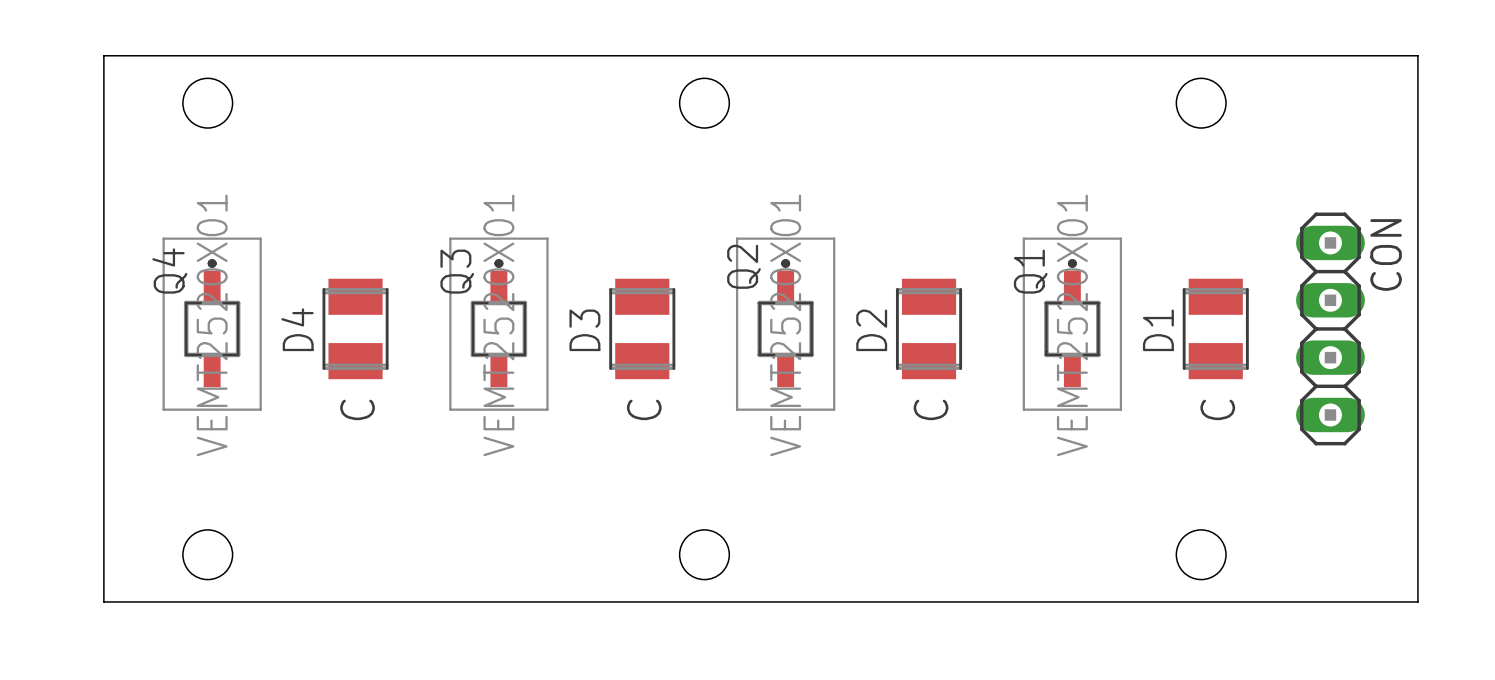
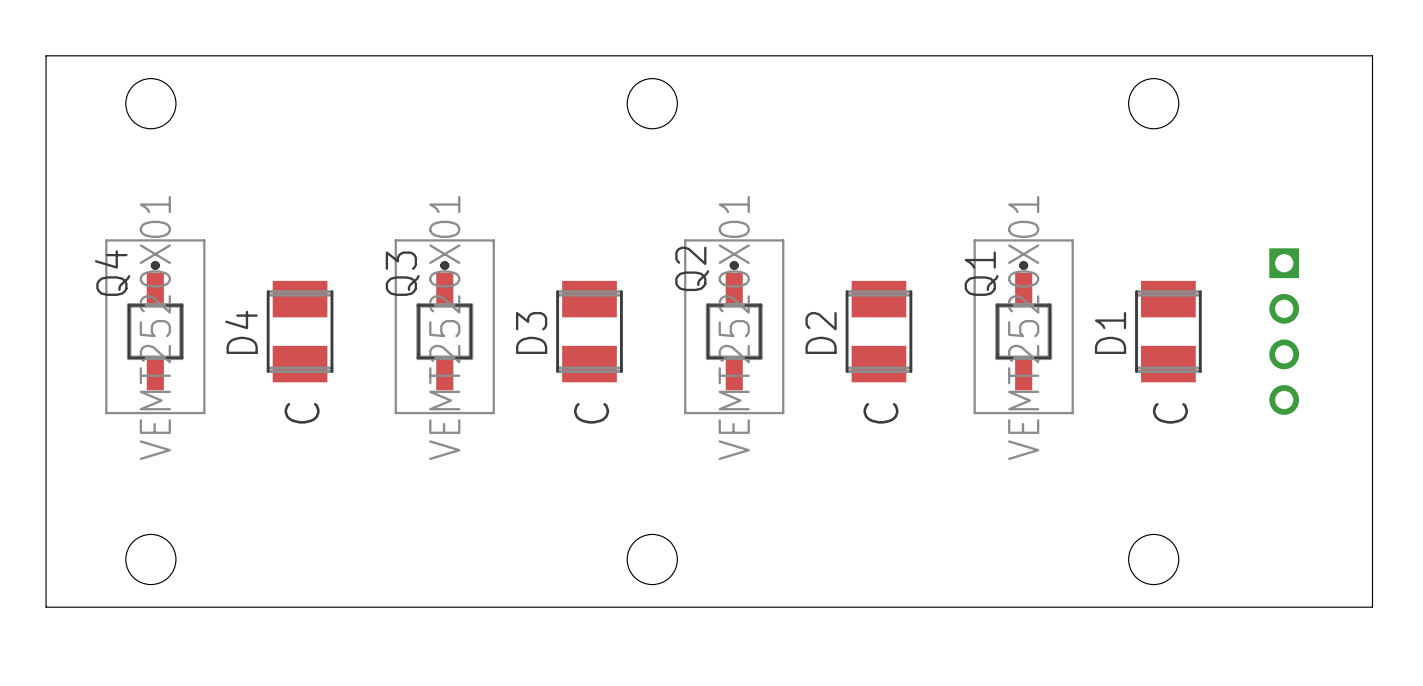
CON: (1330, 328) -> none
part: none -> (1284, 331)

